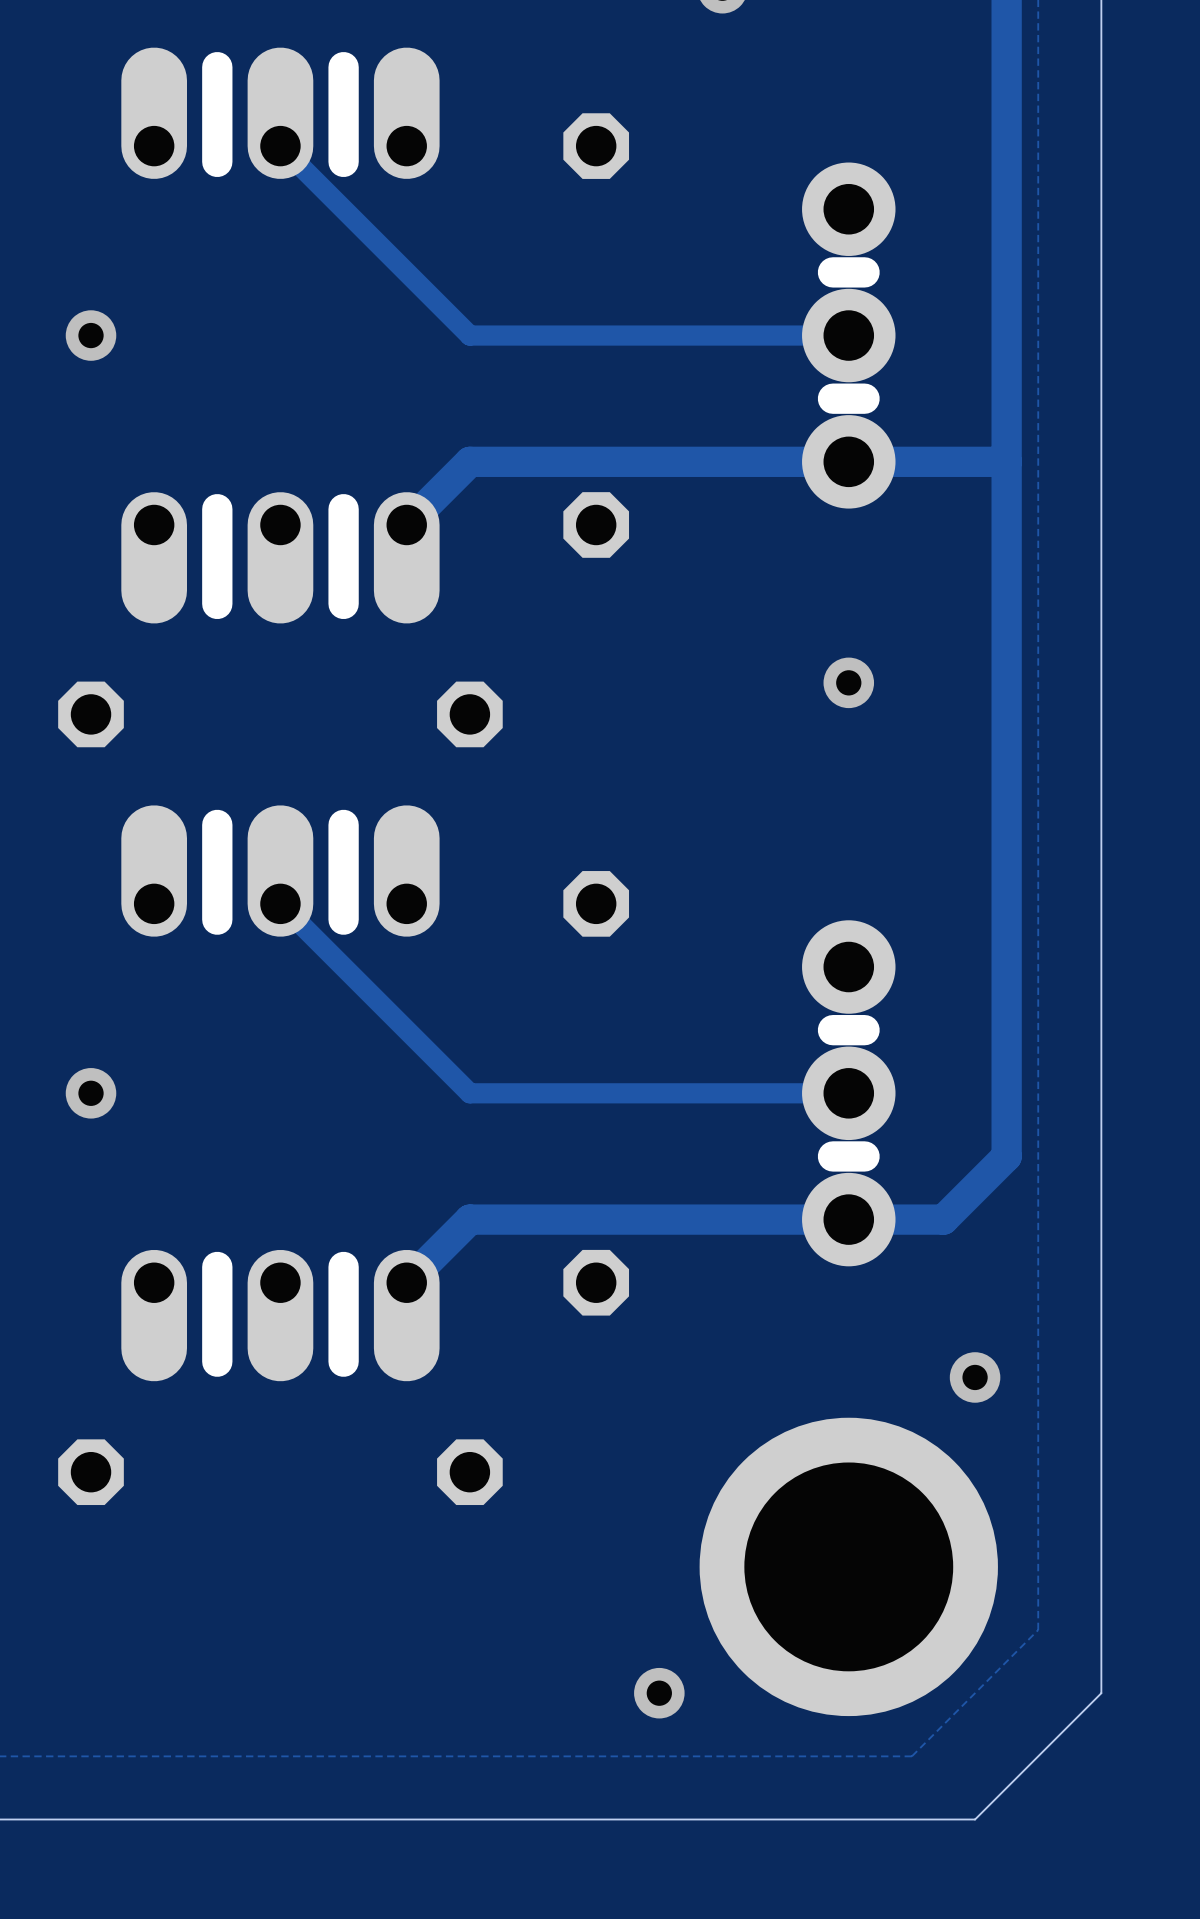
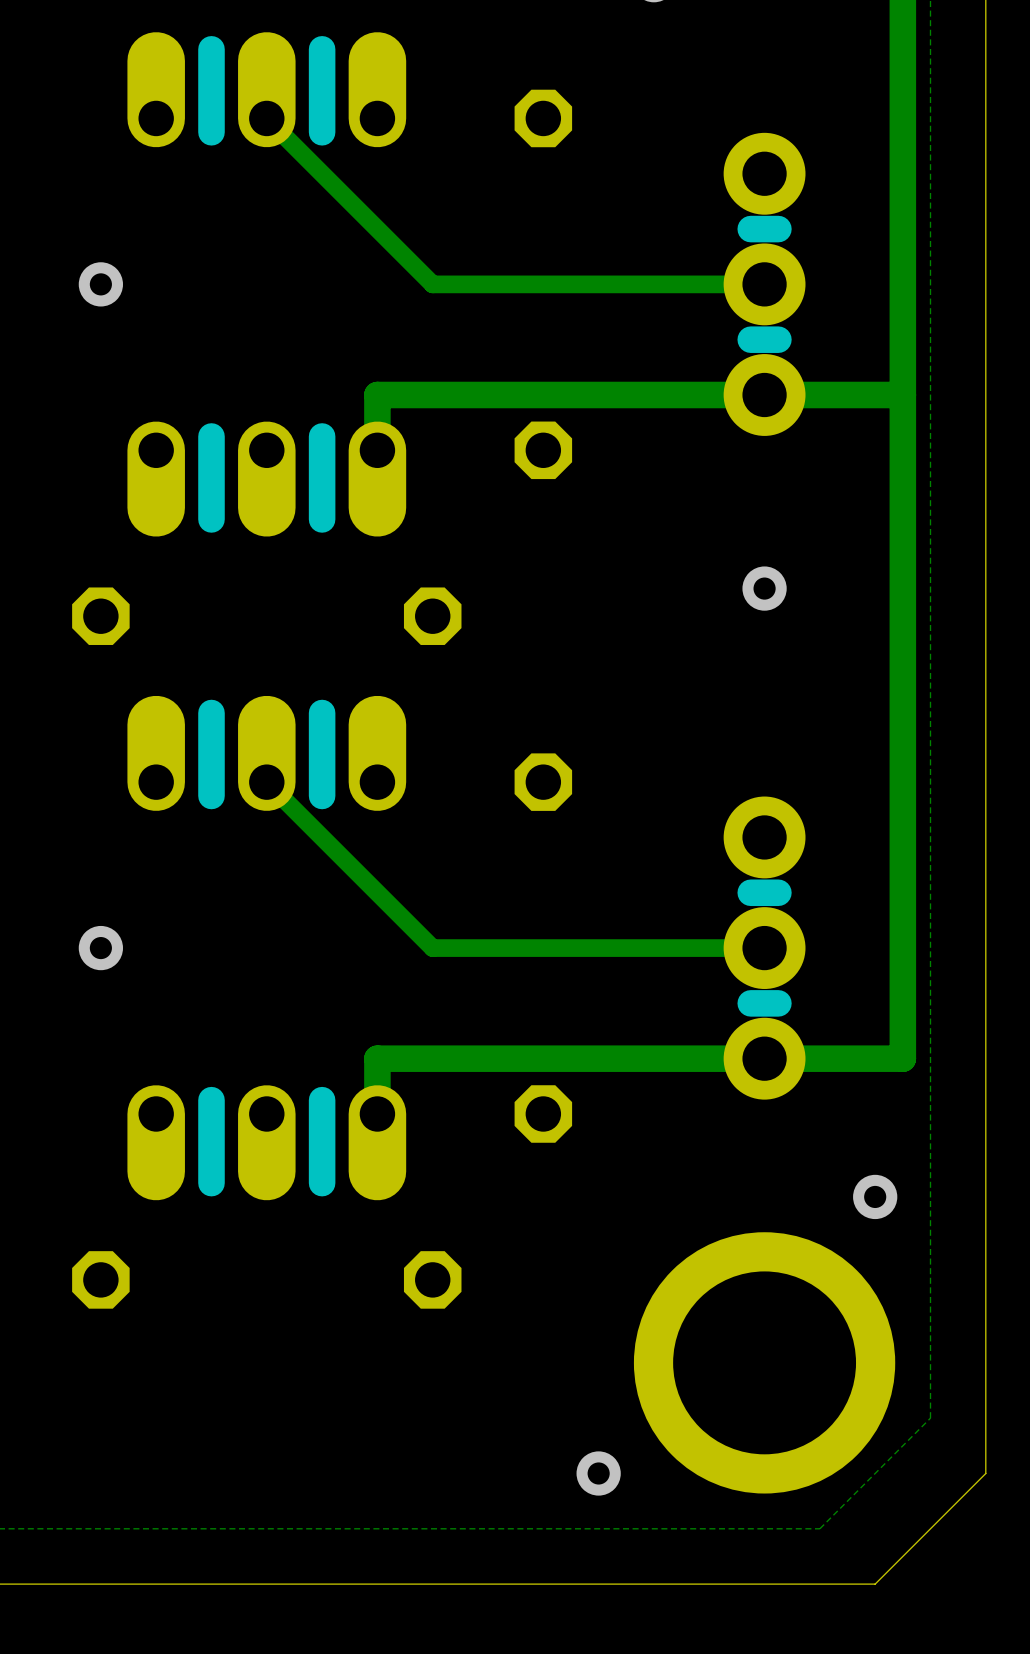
track: (469, 461) (406, 524) -> (432, 394) (377, 394) (377, 450)
track: (1006, 1156) (943, 1219) -> (902, 1003) (902, 1058) (847, 1058)
track: (469, 1219) (406, 1282) -> (432, 1058) (377, 1058) (377, 1113)

